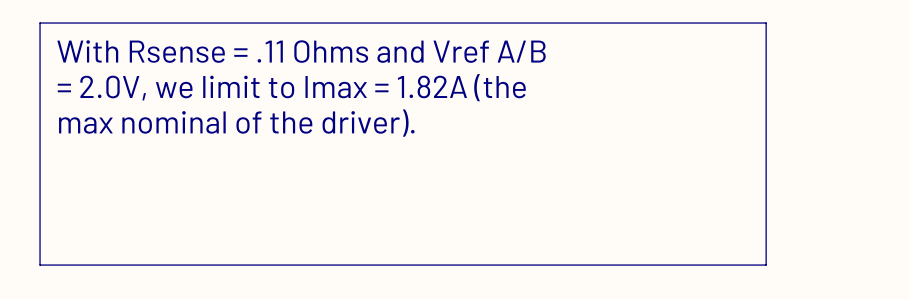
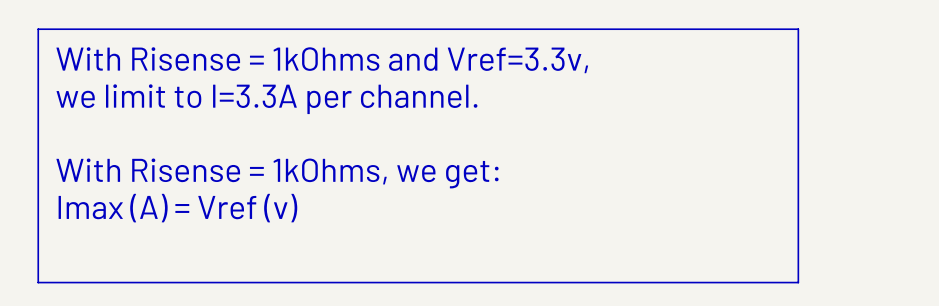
text: With Rsense = .11 Ohms and Vref A/B (301, 51) -> With Risense = 1kOhms and Vref=3.3v, (322, 60)
text: = 2.0V, we limit to Imax = 1.82A (the (291, 87) -> we limit to I=3.3A per channel. (266, 99)
text: max nominal of the driver). (236, 123) -> none
text: none -> With Risense = 1kOhms, we get: (277, 173)
text: none -> Imax (A) = Vref (v) (177, 208)

